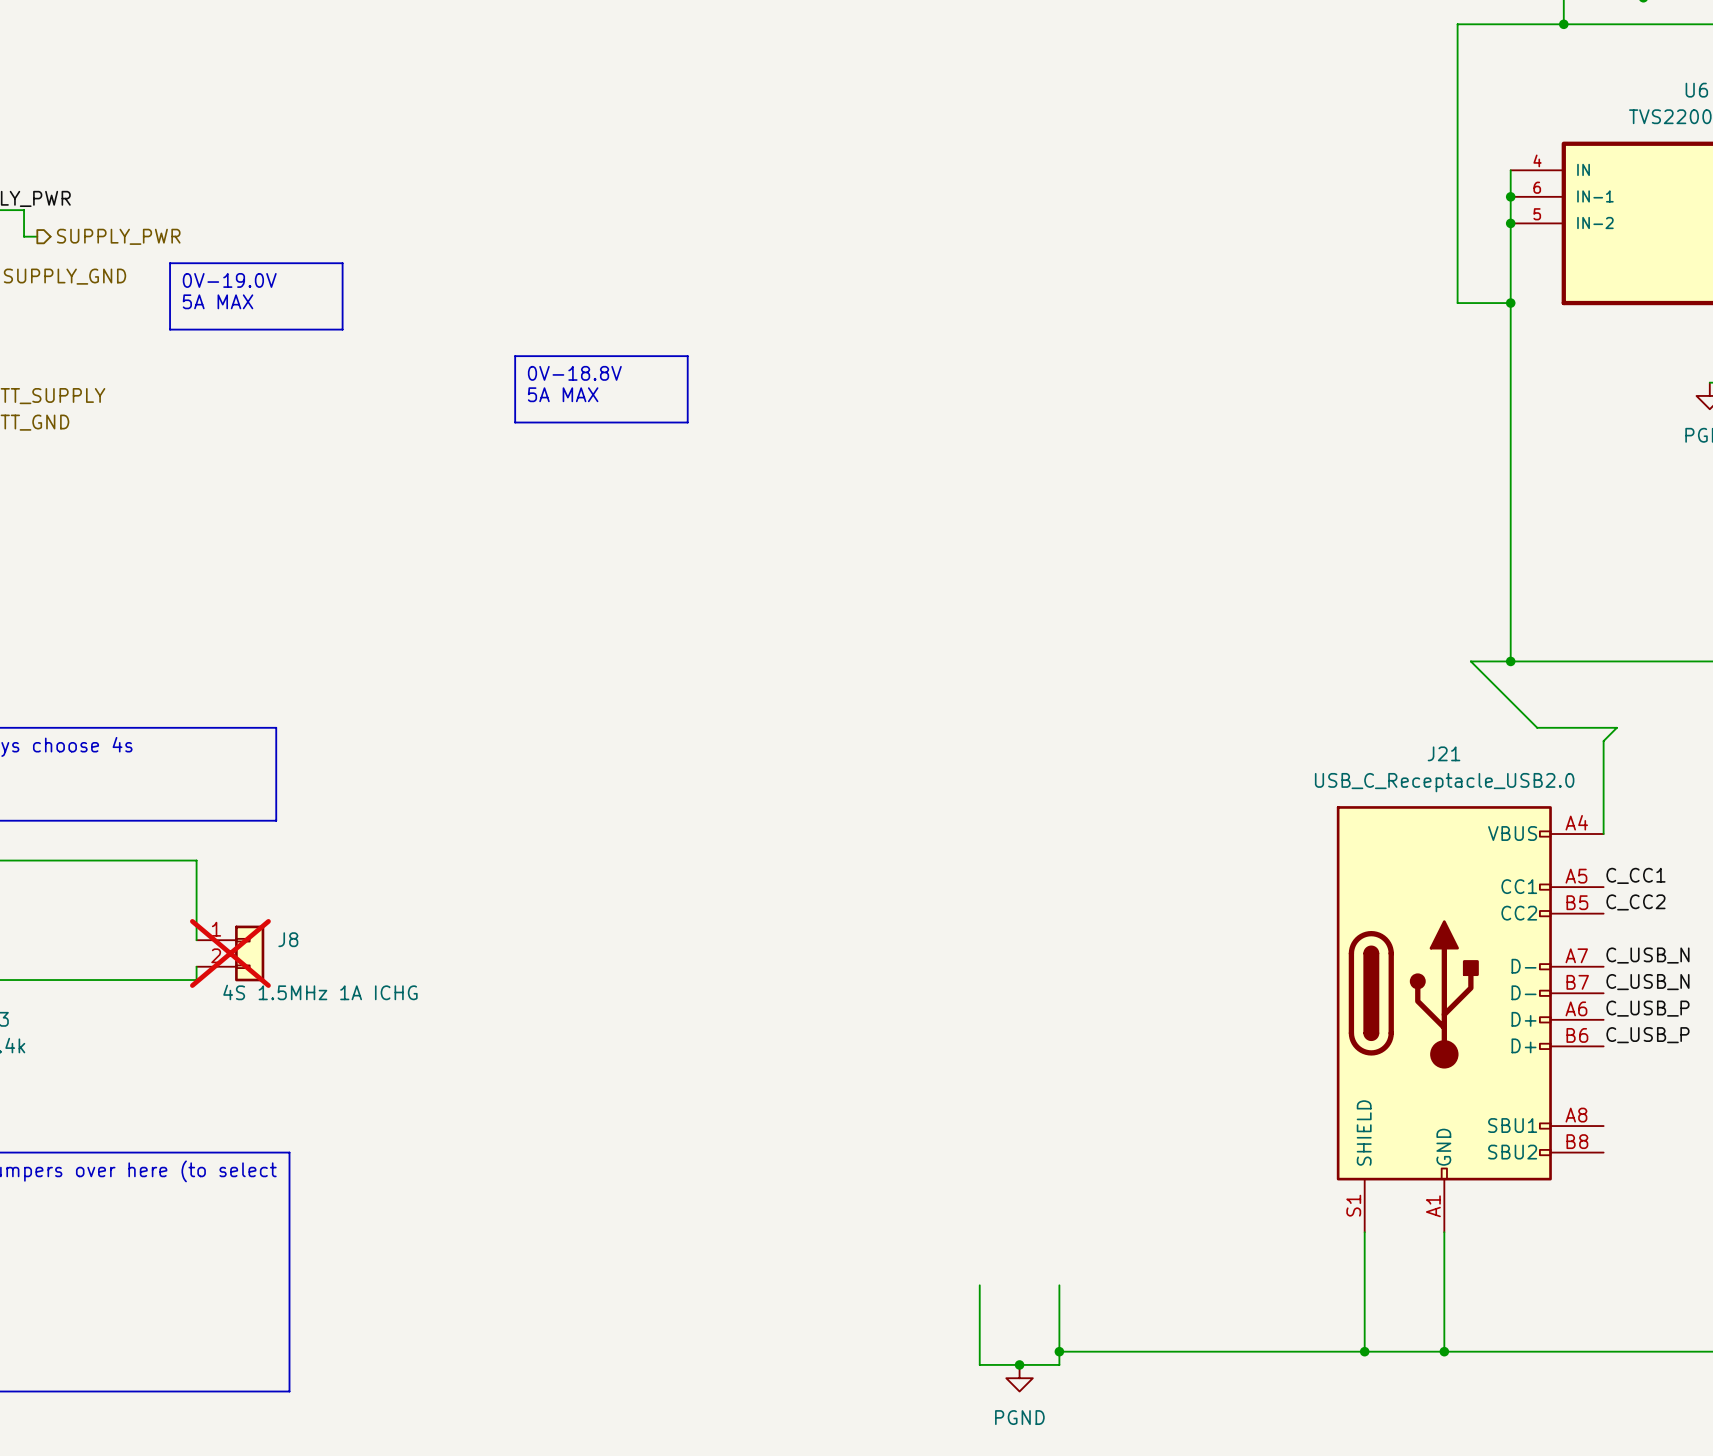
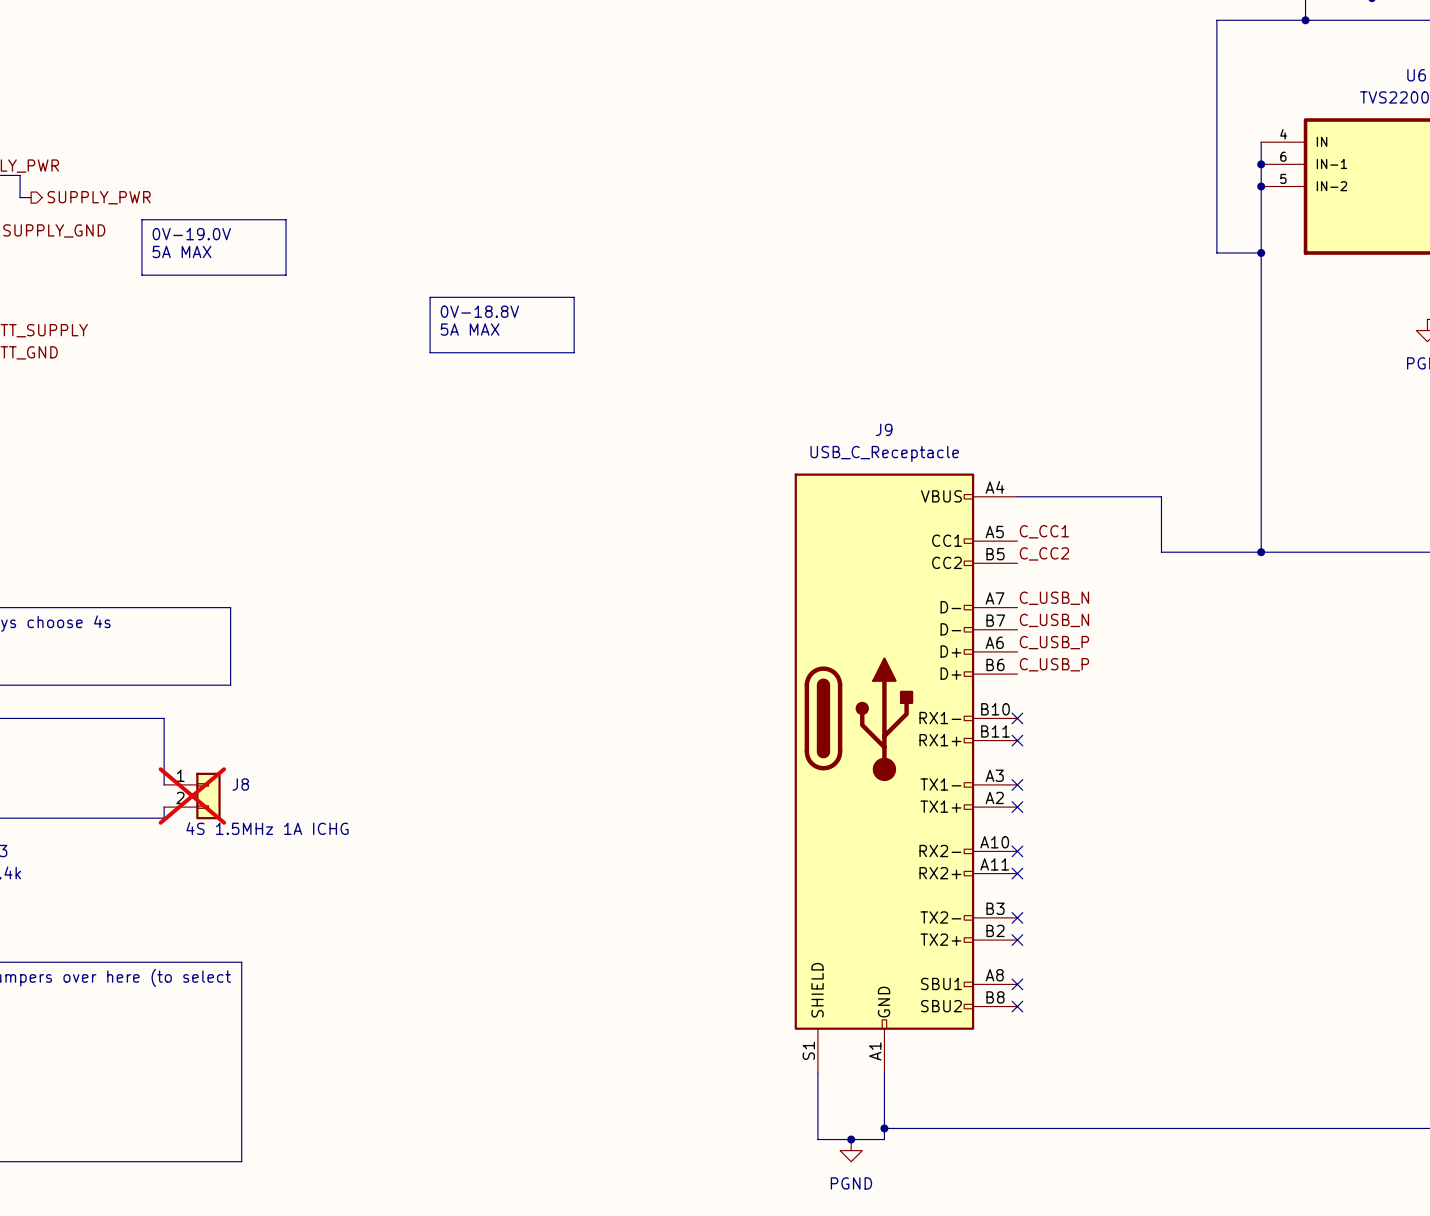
label: none -> C_CC1 (1044, 531)
wire: (1470, 661) (1537, 727) (1616, 727) (1603, 741) (1603, 834) -> (1227, 552) (1161, 552) (1161, 496) (1017, 496)
label: none -> C_CC2 (1044, 553)
label: none -> C_USB_N (1054, 598)
label: none -> C_USB_N (1054, 620)
label: none -> C_USB_P (1054, 642)
label: none -> C_USB_P (1054, 664)
no-connect mark: none -> (1017, 718)
label: C_CC1 (1635, 875) -> none
no-connect mark: none -> (1017, 740)
label: C_CC2 (1635, 902) -> none
J9: none -> USB_C_Receptacle (906, 773)
no-connect mark: none -> (1017, 784)
label: C_USB_N (1647, 955) -> none
no-connect mark: none -> (1017, 807)
label: C_USB_N (1647, 982) -> none
label: C_USB_P (1647, 1008) -> none
no-connect mark: none -> (1017, 851)
J21: USB_C_Receptacle_USB2.0 (1470, 1019) -> none
label: C_USB_P (1647, 1035) -> none
no-connect mark: none -> (1017, 873)
no-connect mark: none -> (1017, 917)
no-connect mark: none -> (1017, 940)
no-connect mark: none -> (1017, 984)
no-connect mark: none -> (1017, 1006)
wire: (1364, 1232) (1364, 1351) -> none
wire: (1444, 1232) (1444, 1351) -> none
junction: (1364, 1351) -> none
junction: (1444, 1351) -> none

